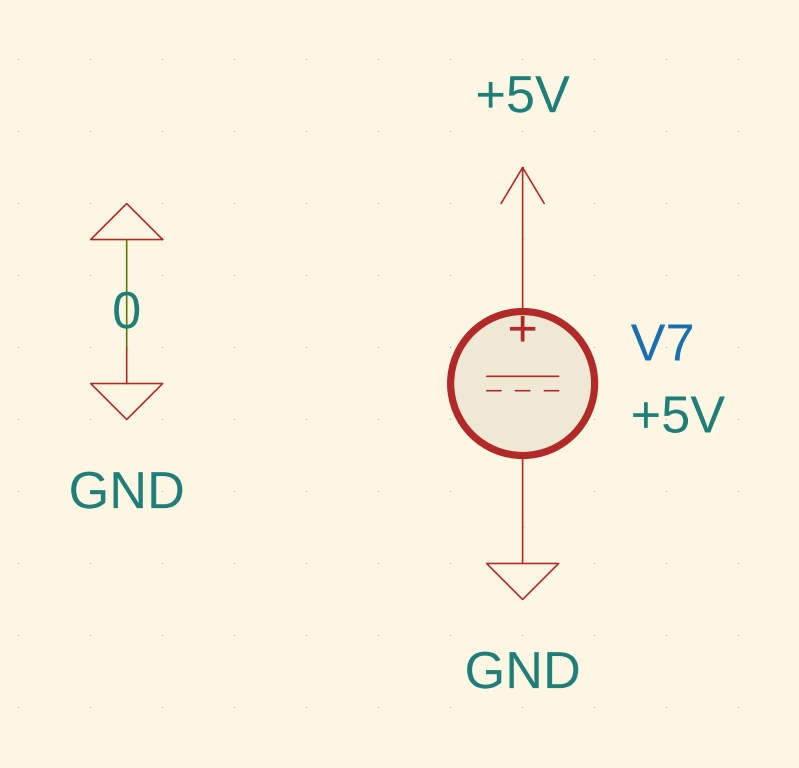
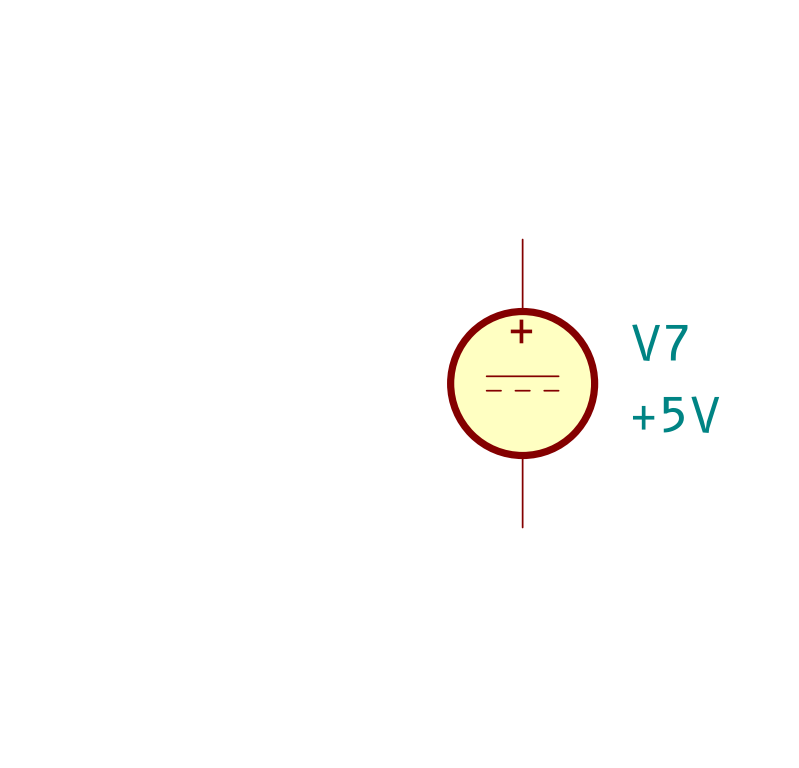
power symbol: +5V (522, 203) -> none
power symbol: 0 (126, 221) -> none
wire: (126, 239) (126, 347) -> none
power symbol: GND (126, 383) -> none
power symbol: GND (522, 563) -> none

